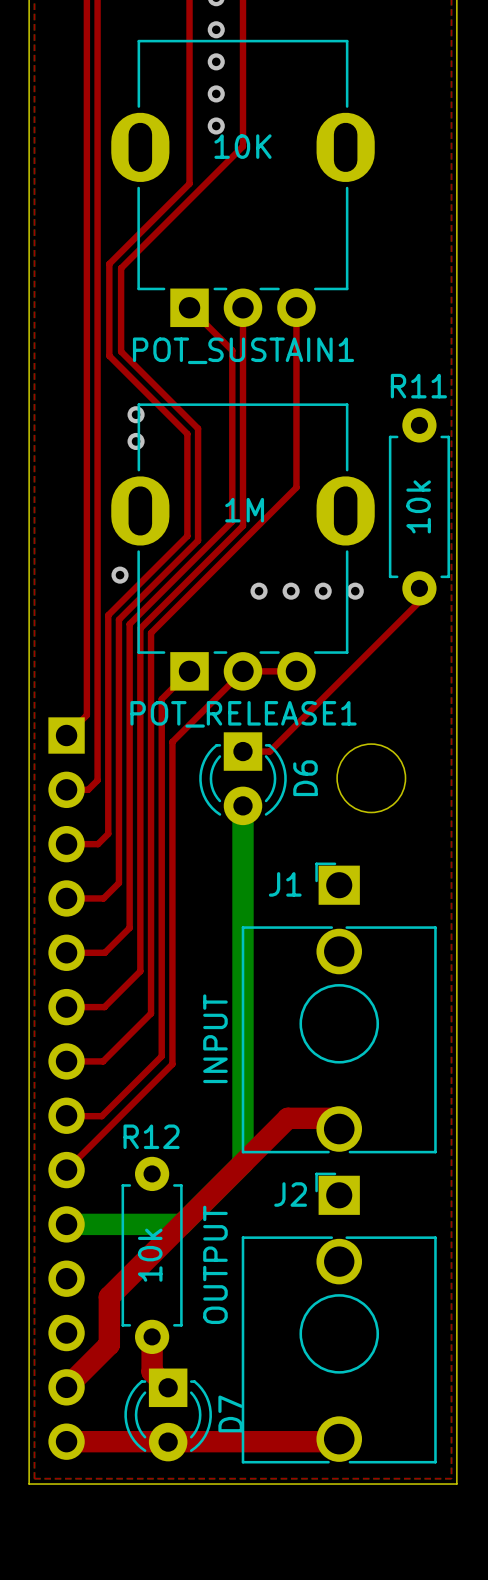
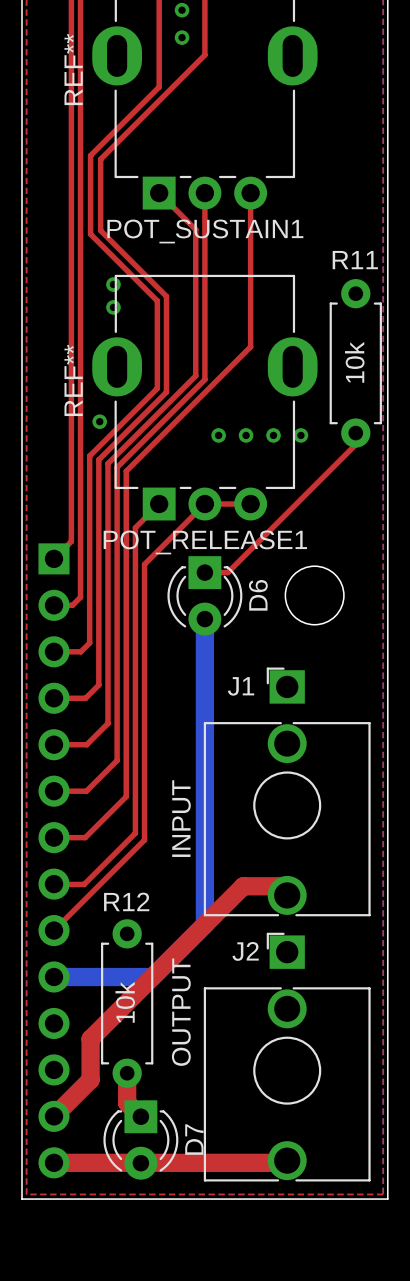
POT_SUSTAIN1 value: 10K (242, 146) -> none
POT_SUSTAIN1 text: none -> REF** (73, 69)
POT_RELEASE1 value: 1M (244, 510) -> none
POT_RELEASE1 text: none -> REF** (73, 380)

